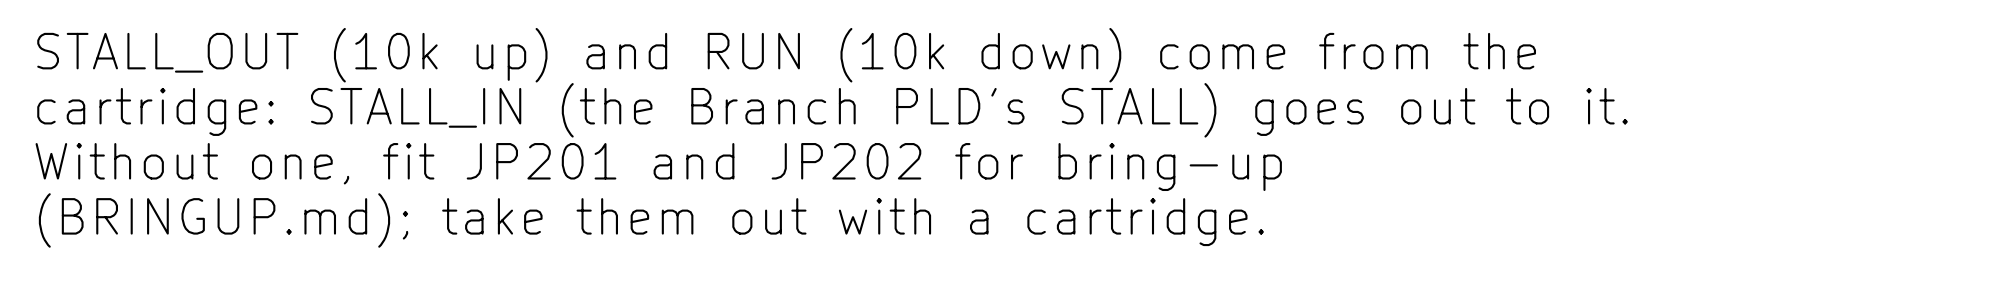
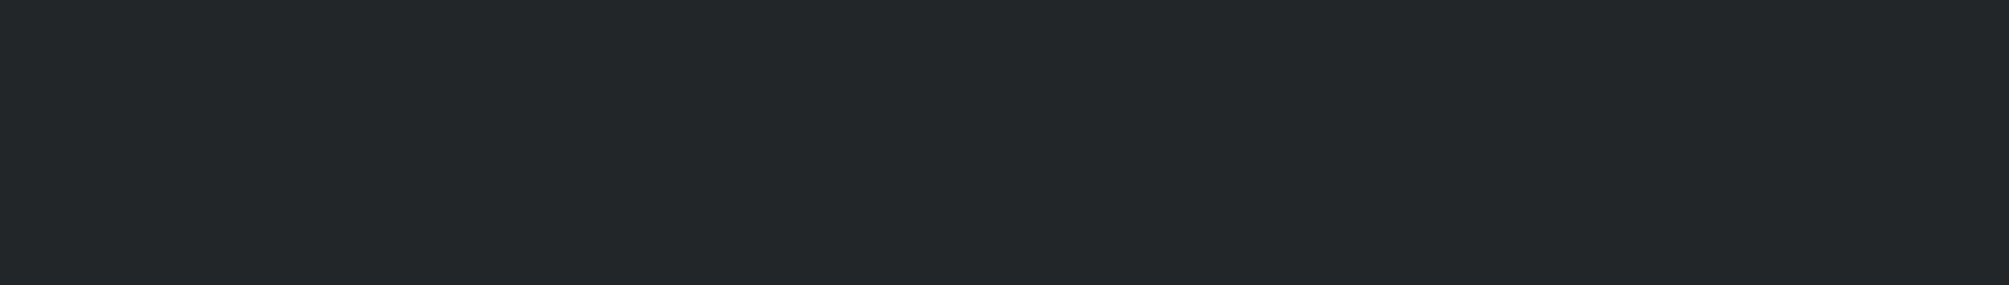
text: STALL_OUT (10k up) and RUN (10k down) come from the (786, 55) -> none
text: cartridge: STALL_IN (the Branch PLD's STALL) goes out to it. (832, 110) -> none
text: Without one, fit JP201 and JP202 for bring-up (658, 167) -> none
text: (BRINGUP.md); take them out with a cartridge. (651, 220) -> none

